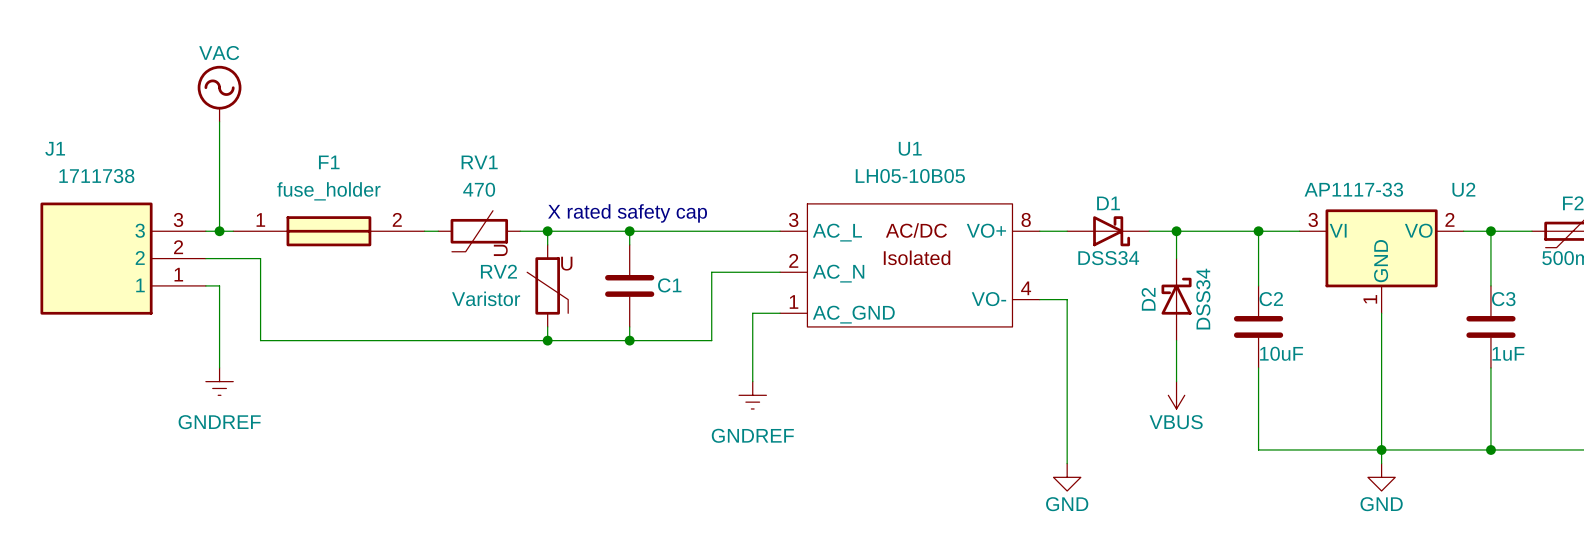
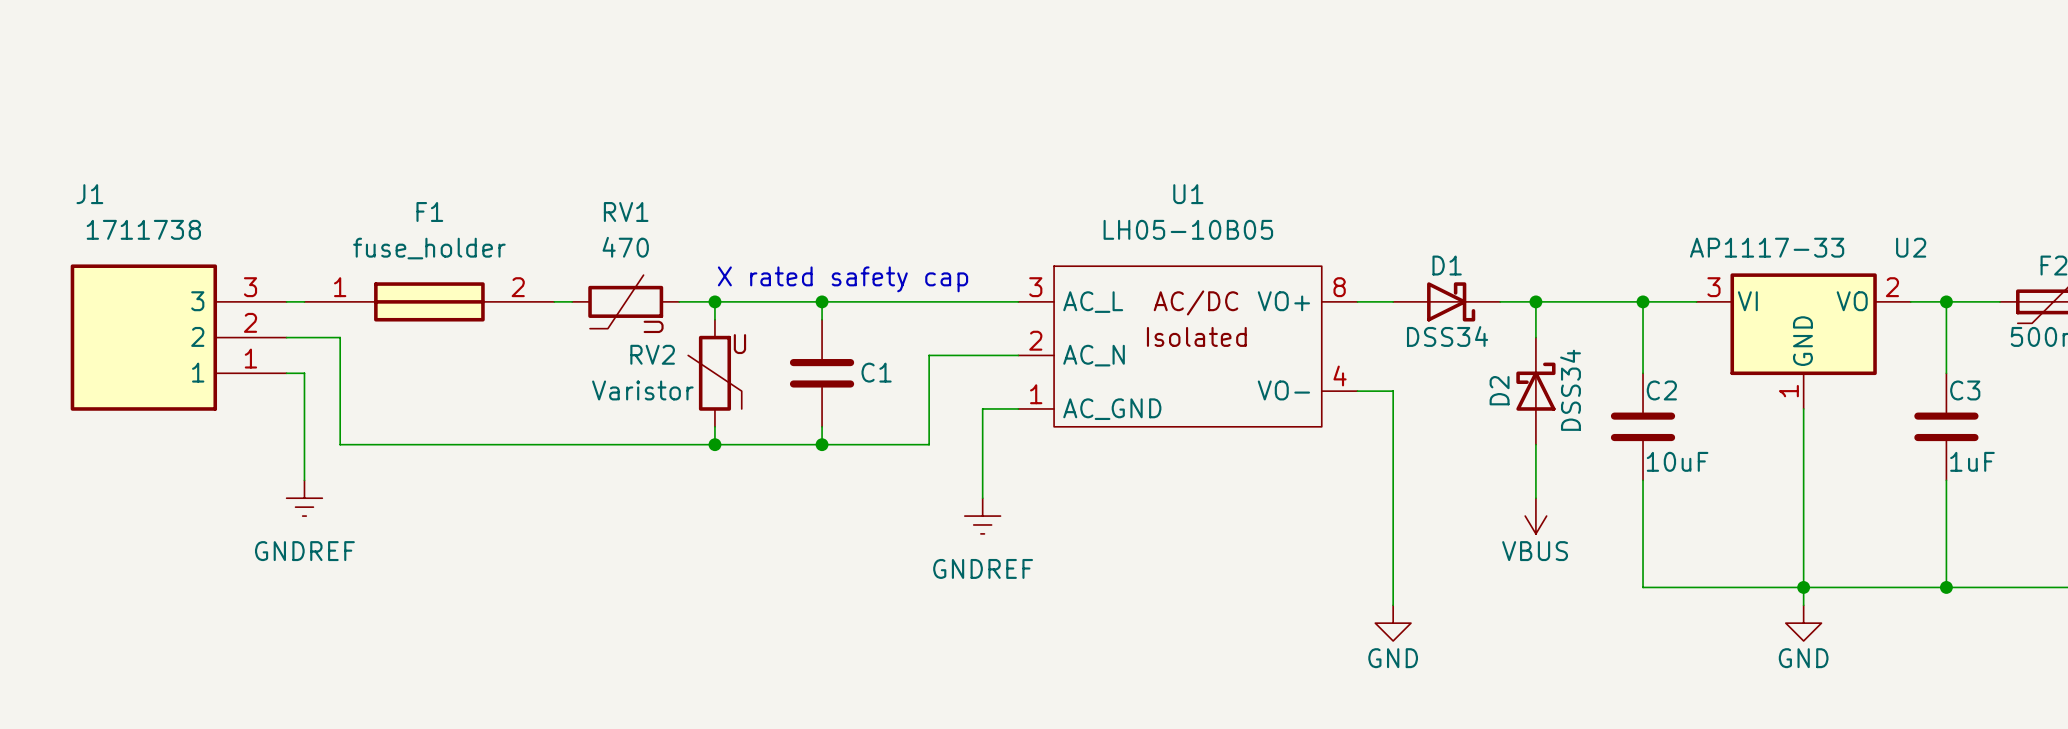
power symbol: VAC (219, 93) -> none
wire: (219, 121) (219, 231) (205, 231) -> none
junction: (219, 231) -> none
J1 position: (123, 258) -> (178, 337)
wire: (205, 285) (219, 285) (219, 367) -> (286, 373) (304, 373) (304, 480)
power symbol position: GNDREF (219, 381) -> GNDREF (304, 498)

